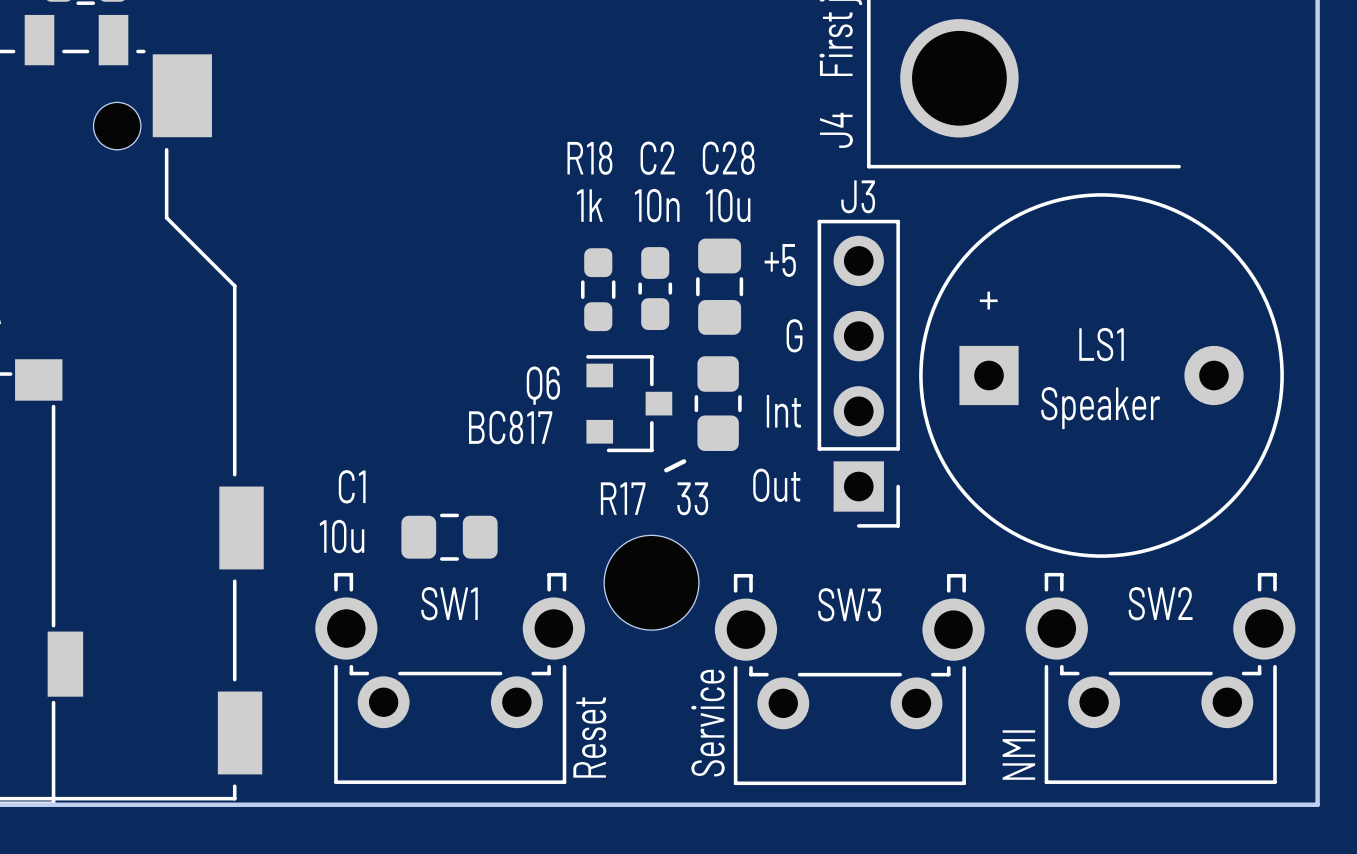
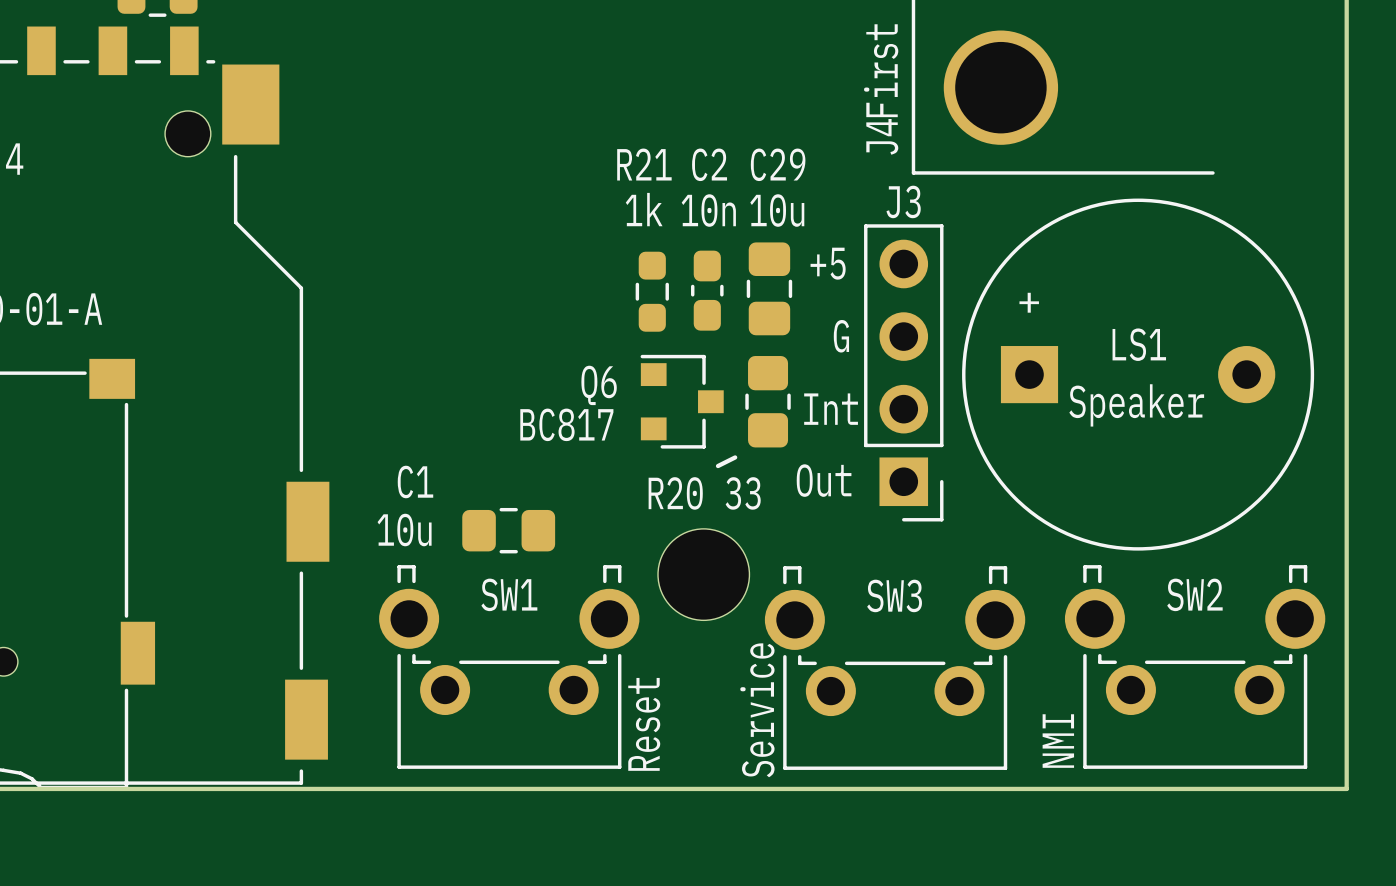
R18 name: R18 (589, 158) -> R21 (644, 164)
C28 name: C28 (728, 158) -> C29 (778, 164)
R17 name: R17 (623, 498) -> R20 (675, 493)

